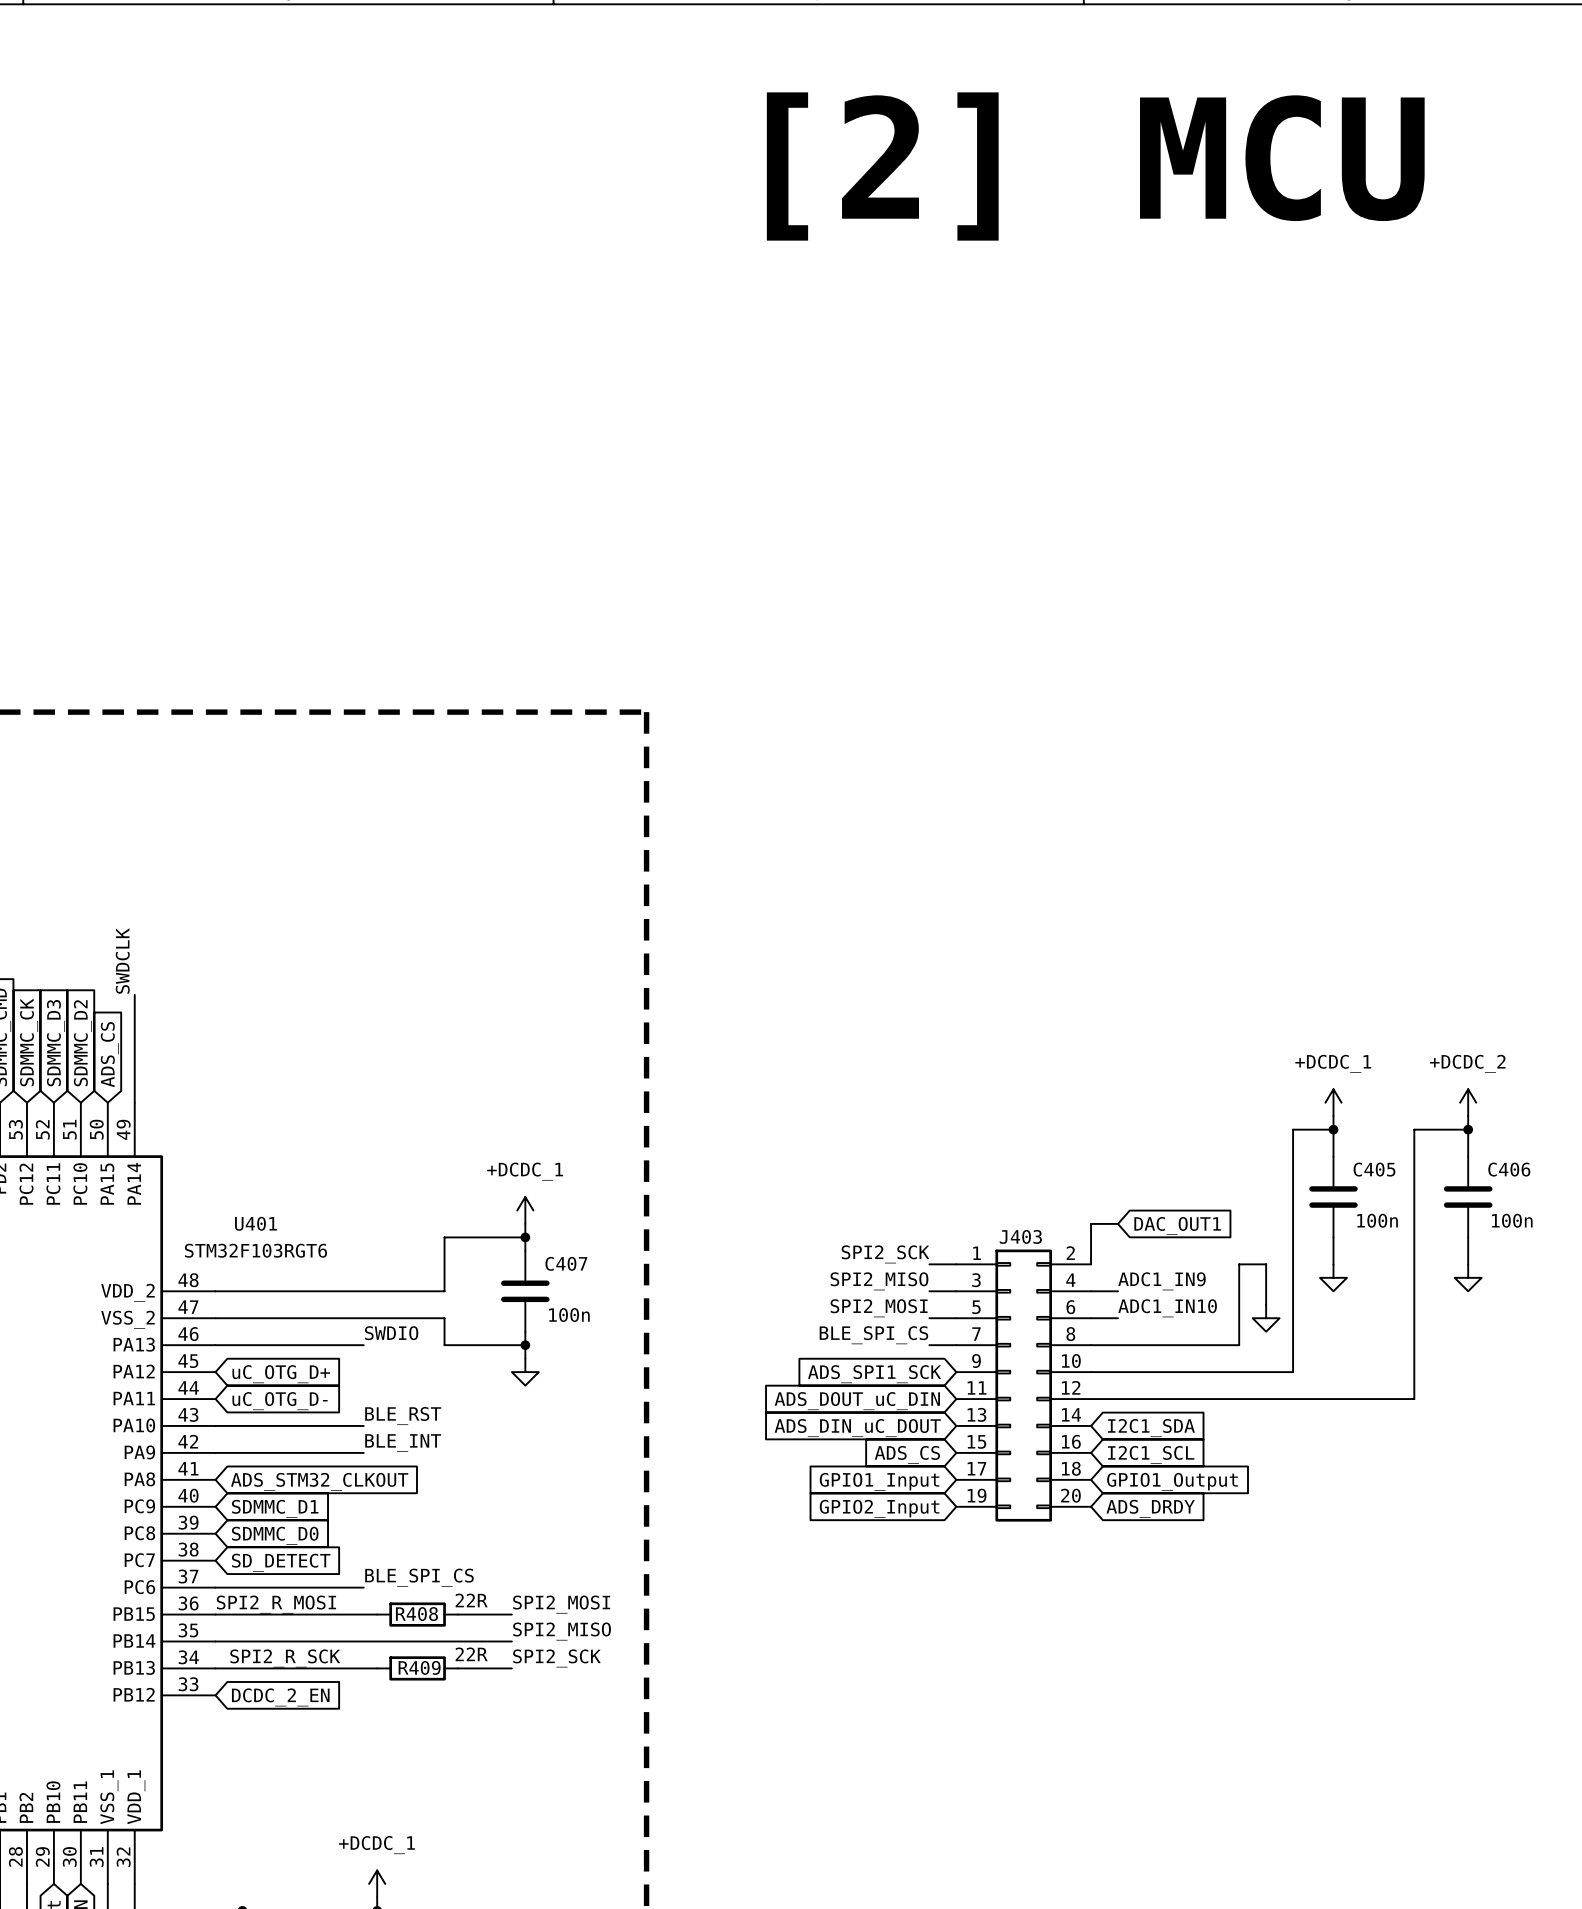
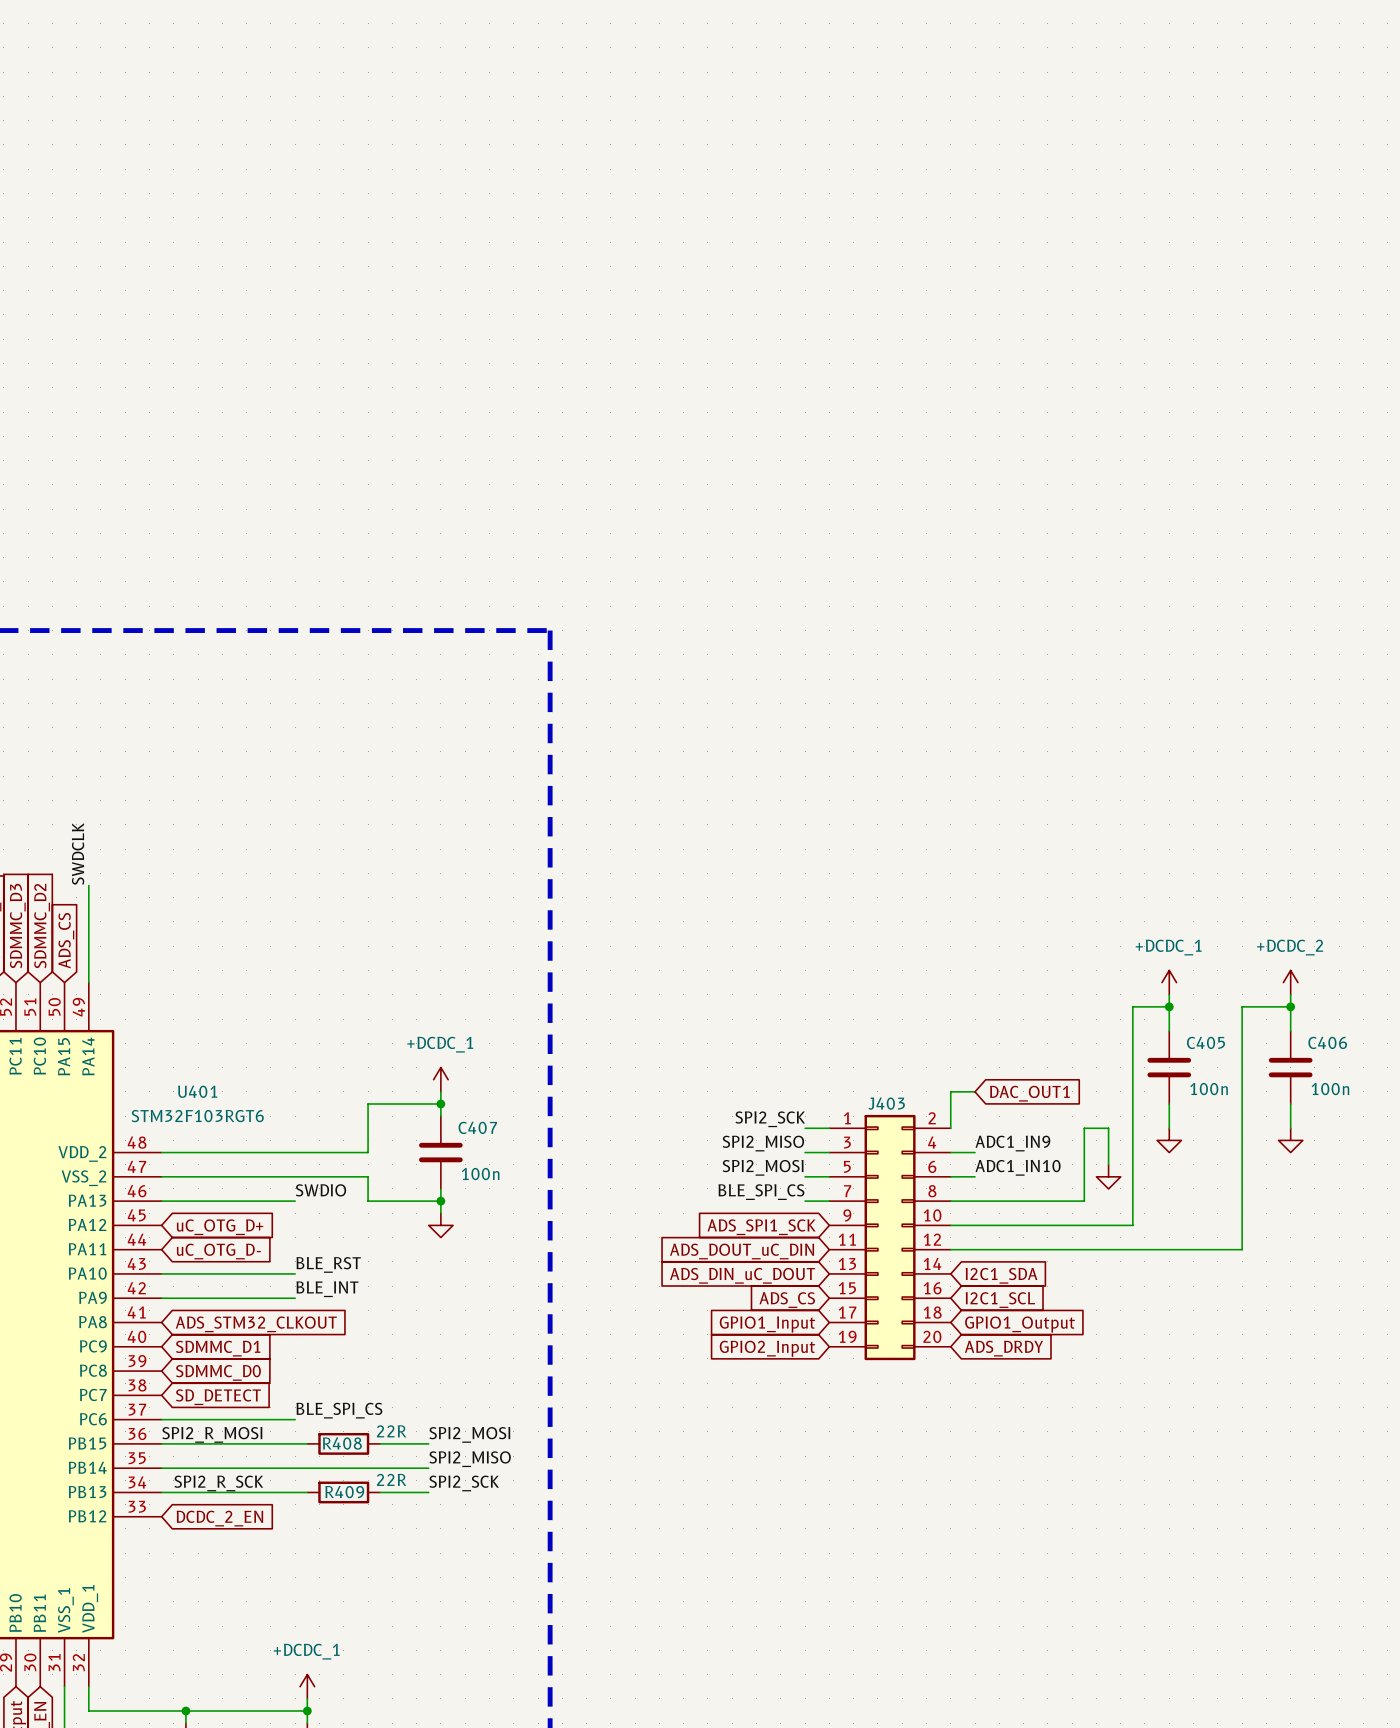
text: [2] MCU (1095, 166) -> none

